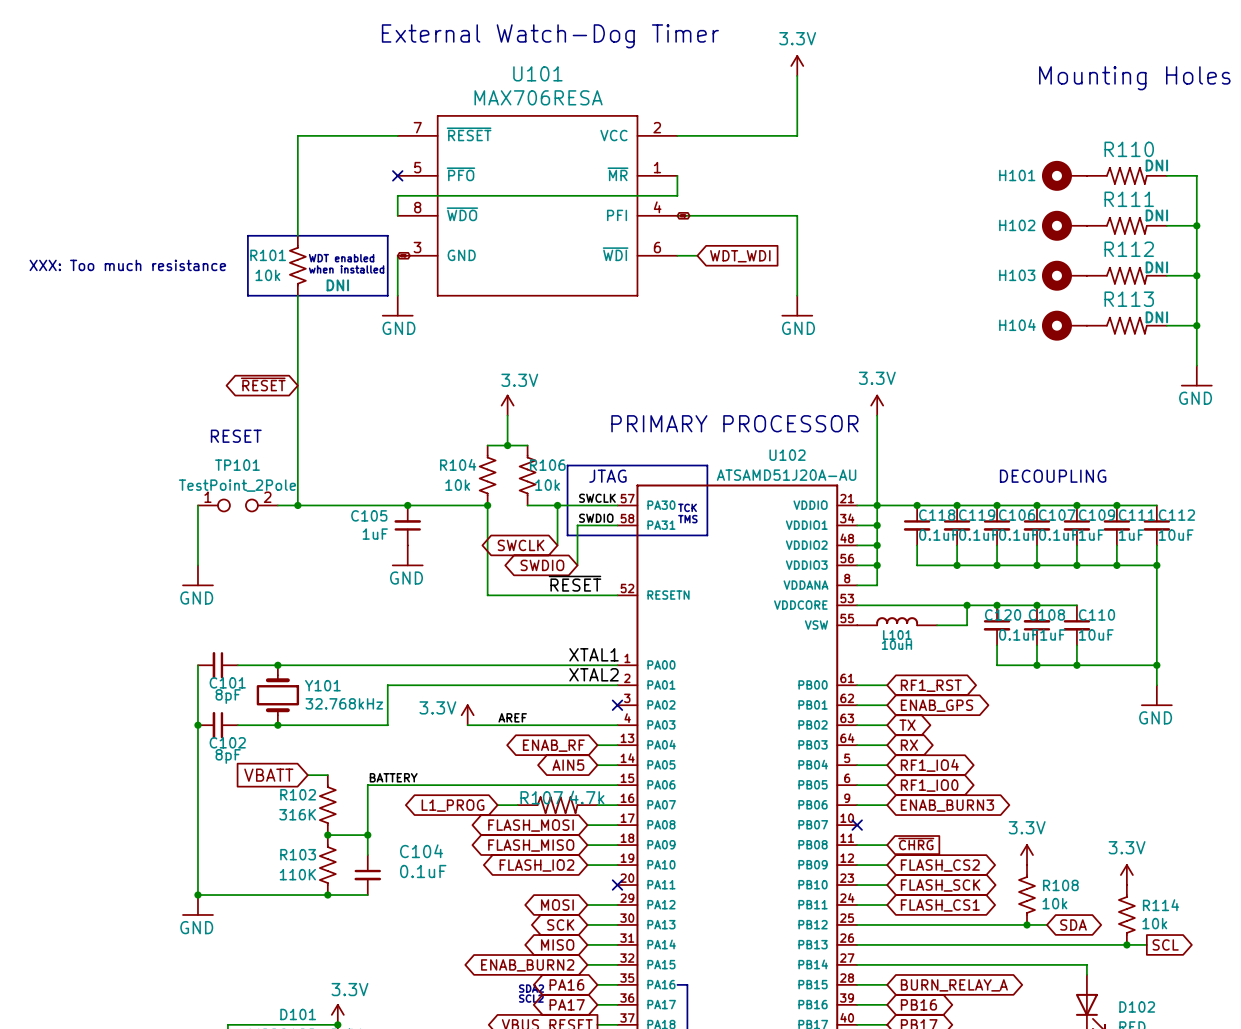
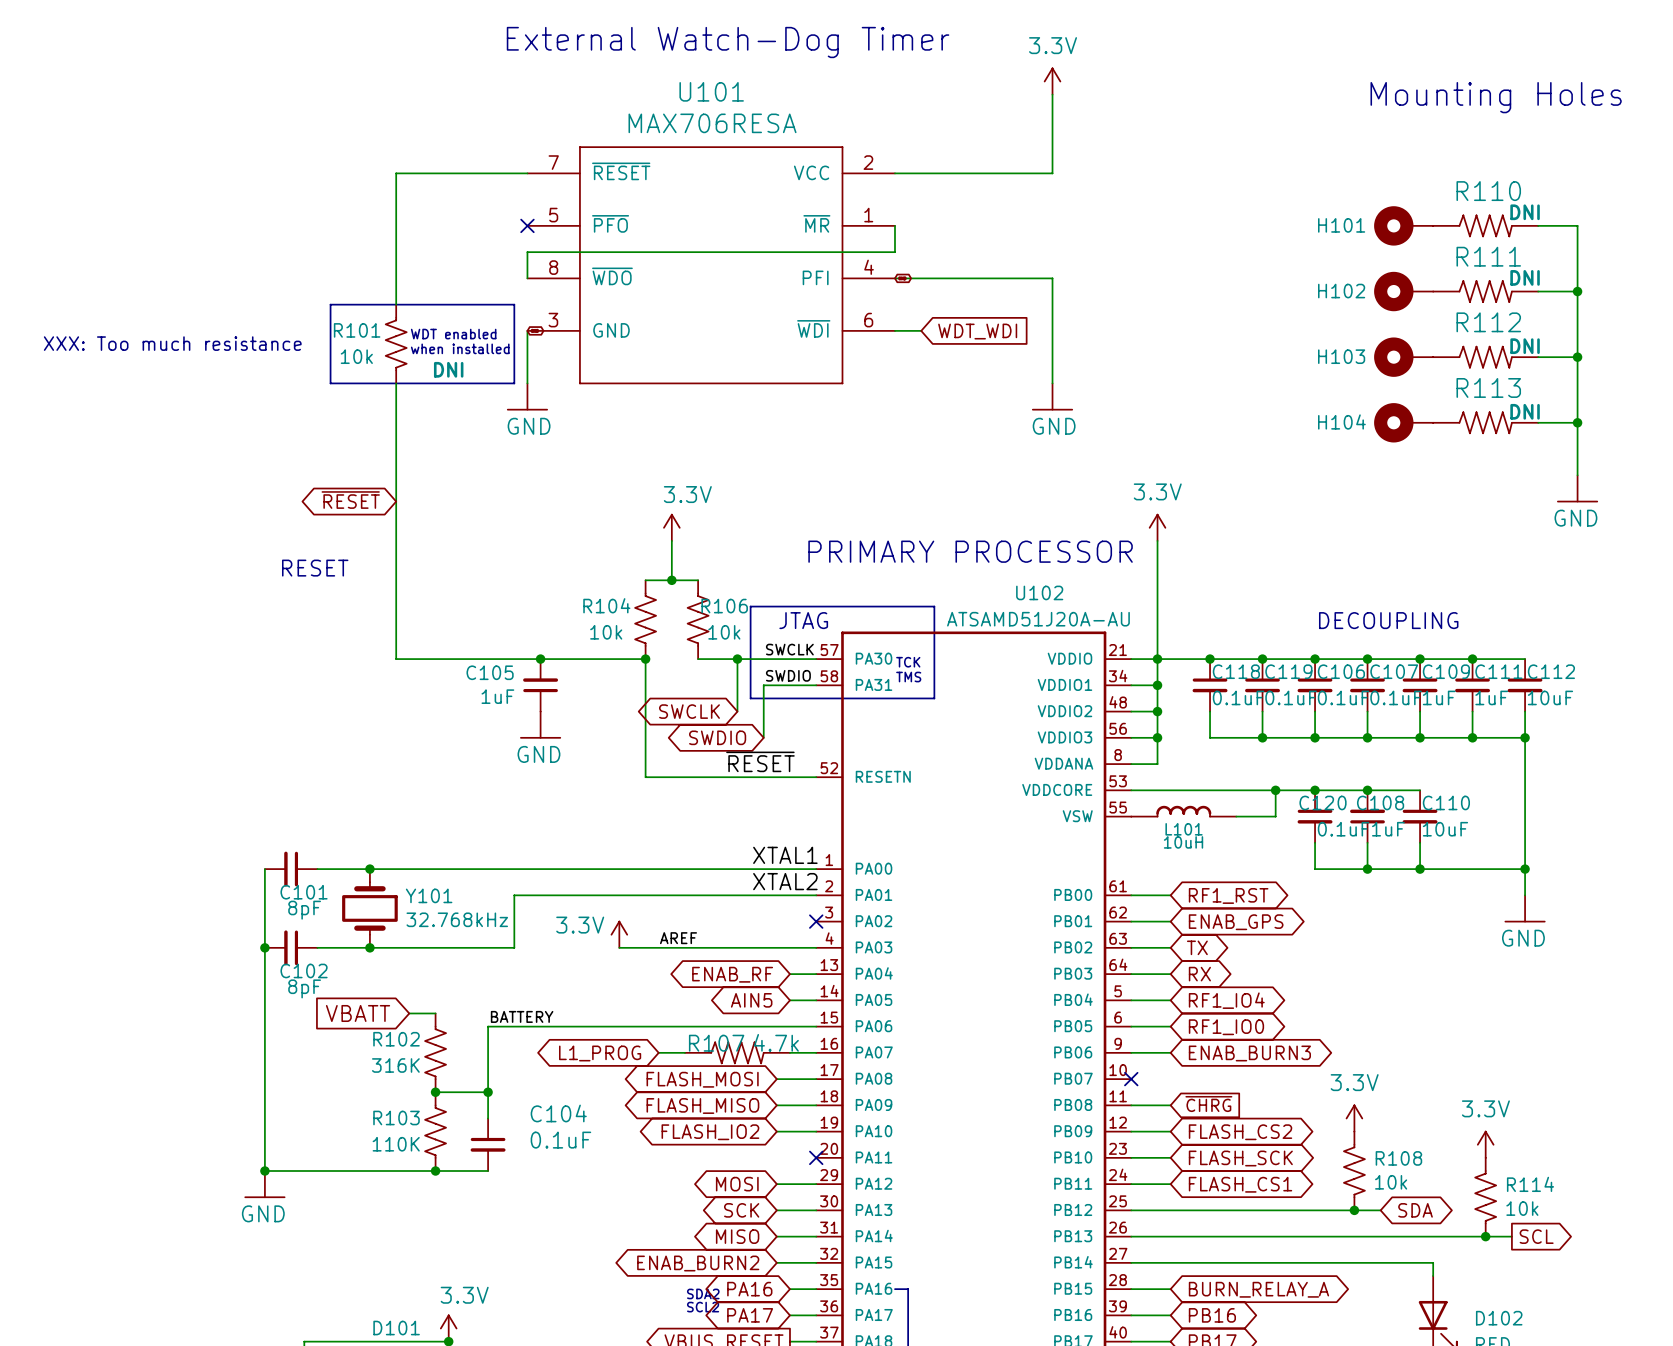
wire: (197, 505) (197, 565) -> none
TP101: TestPoint_2Pole (237, 505) -> none
wire: (277, 505) (297, 505) -> none
junction: (297, 505) -> none
power symbol: GND (197, 575) -> none

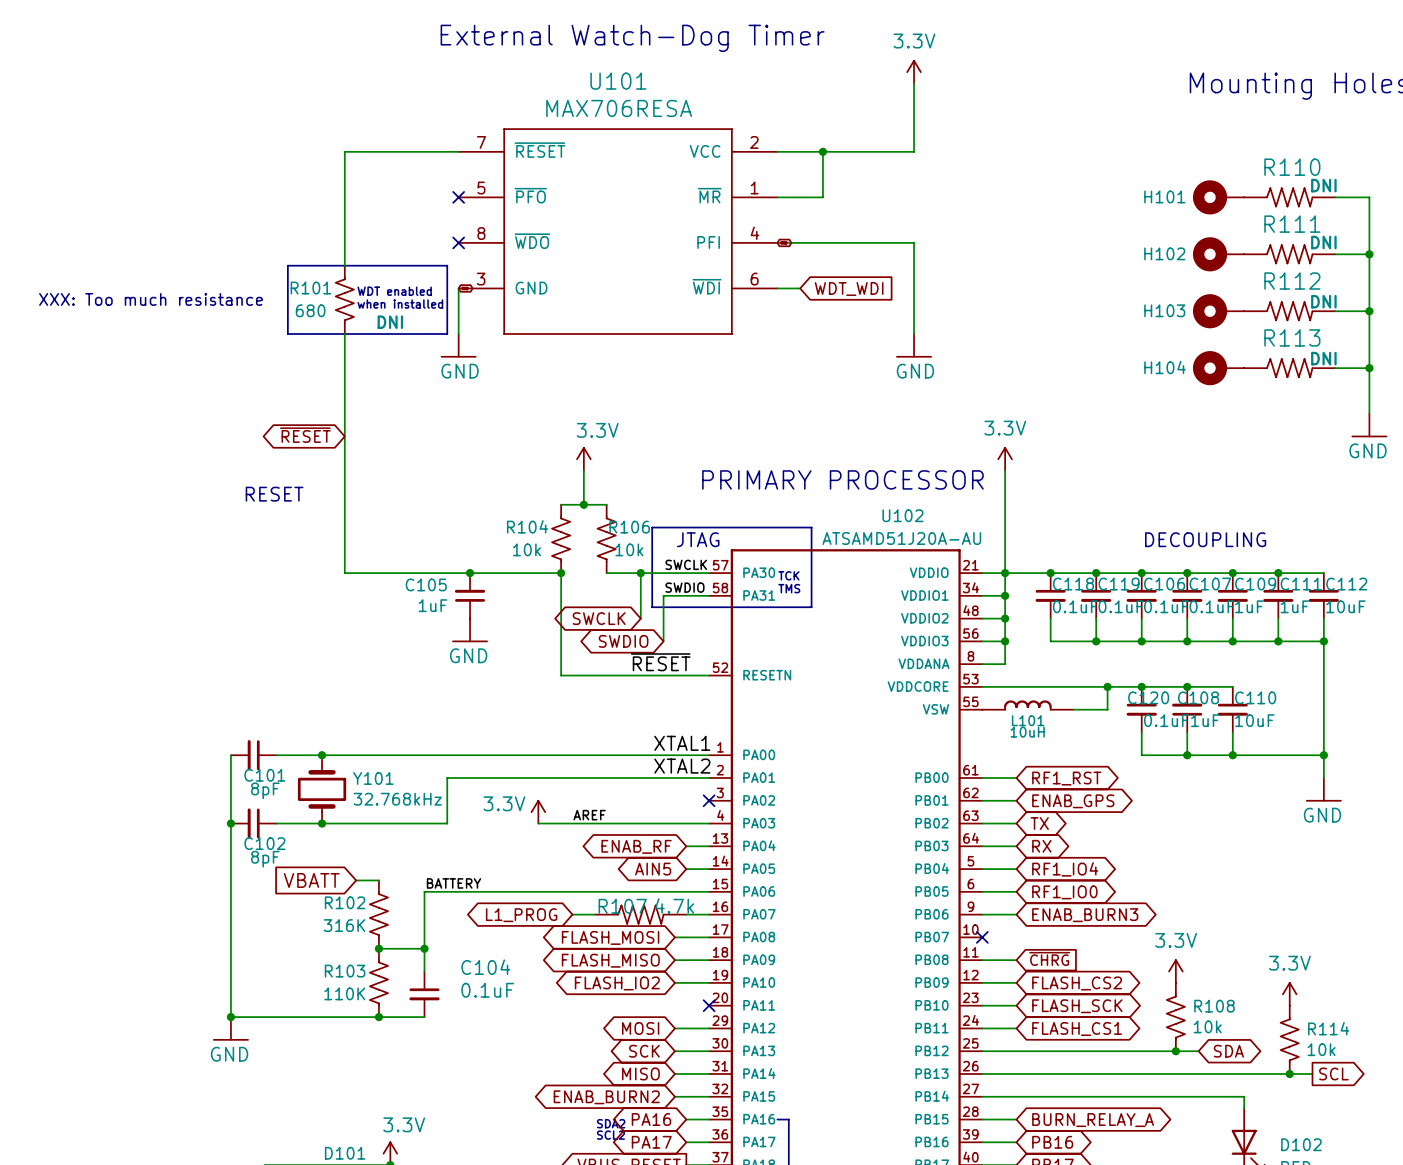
junction: none -> (822, 151)
wire: (894, 225) (894, 252) (527, 252) (527, 278) -> (777, 197) (822, 197) (822, 151)
no-connect mark: none -> (458, 242)
R101 value: 10k (356, 356) -> 680 (310, 310)

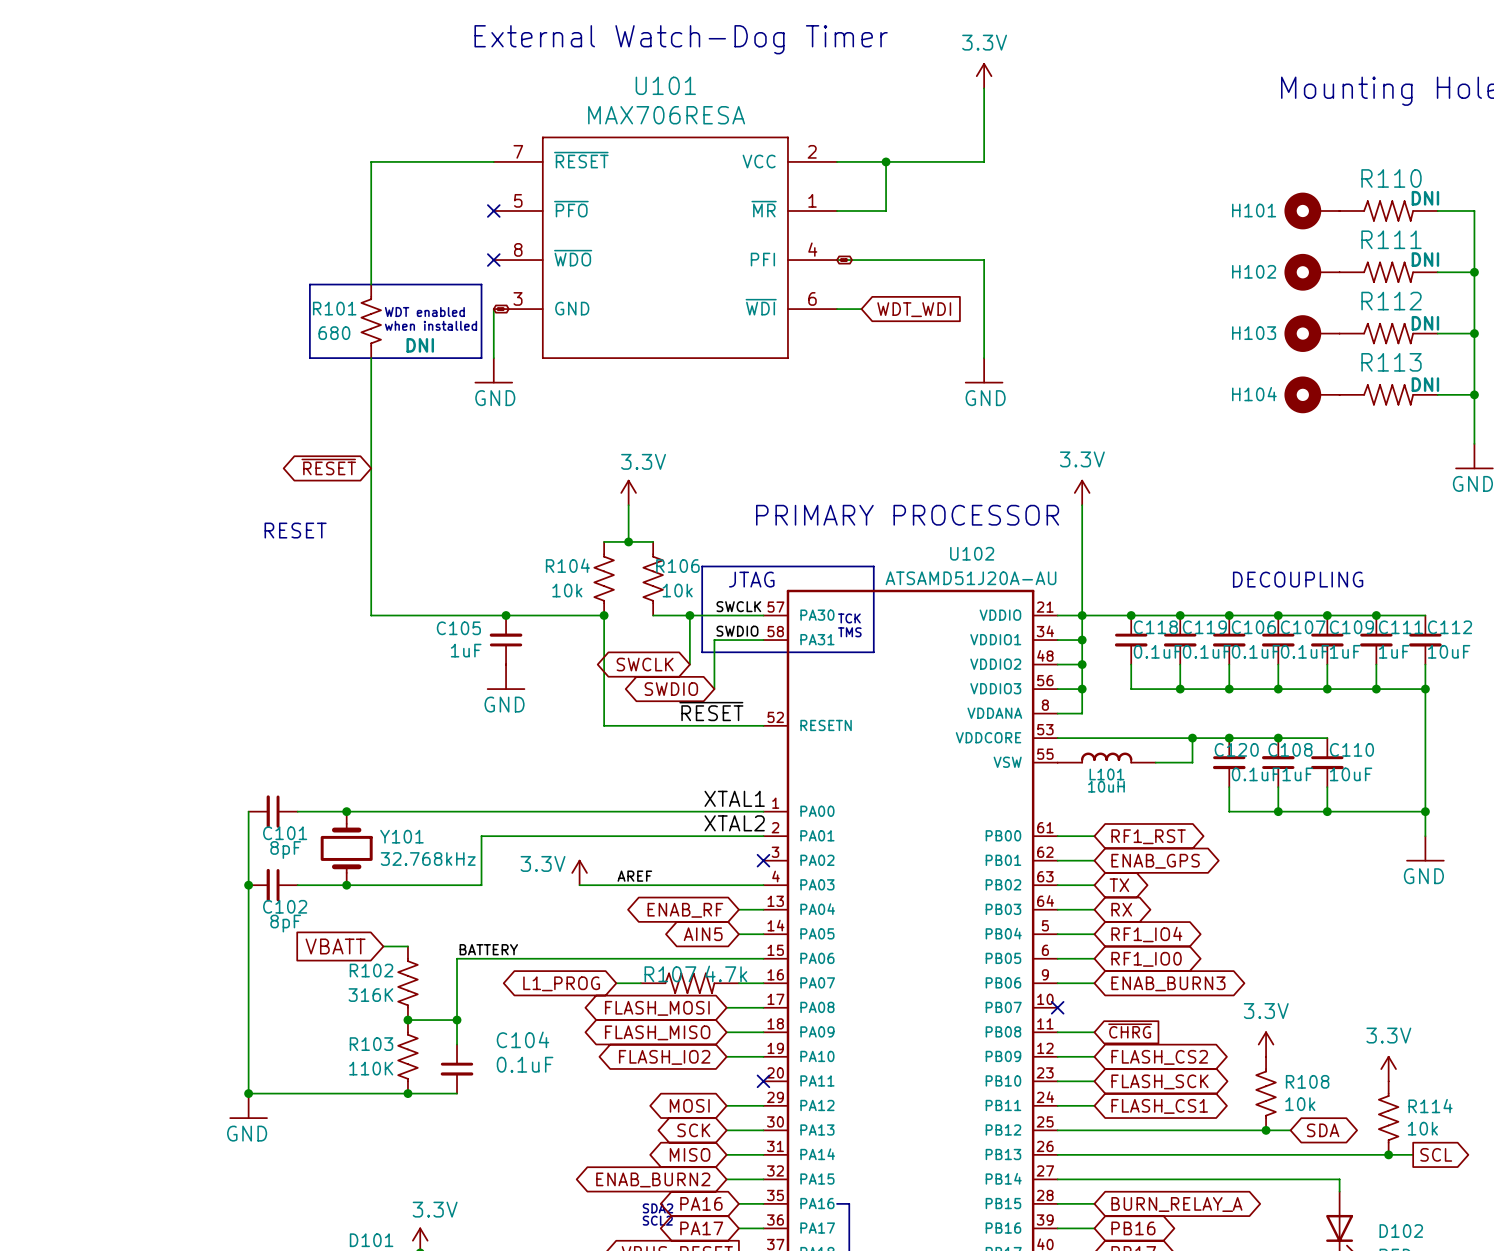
text: XXX: Too much resistance (150, 299) -> none

